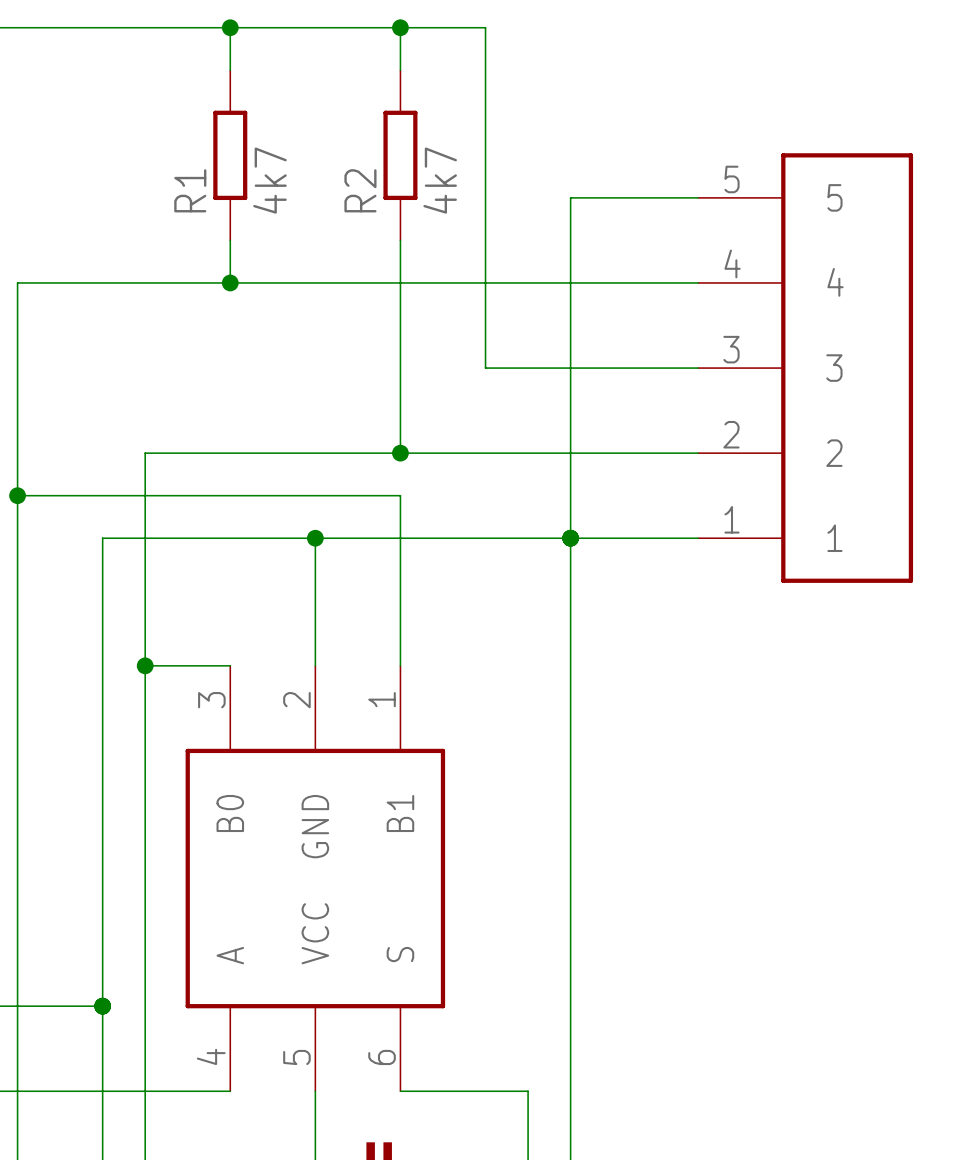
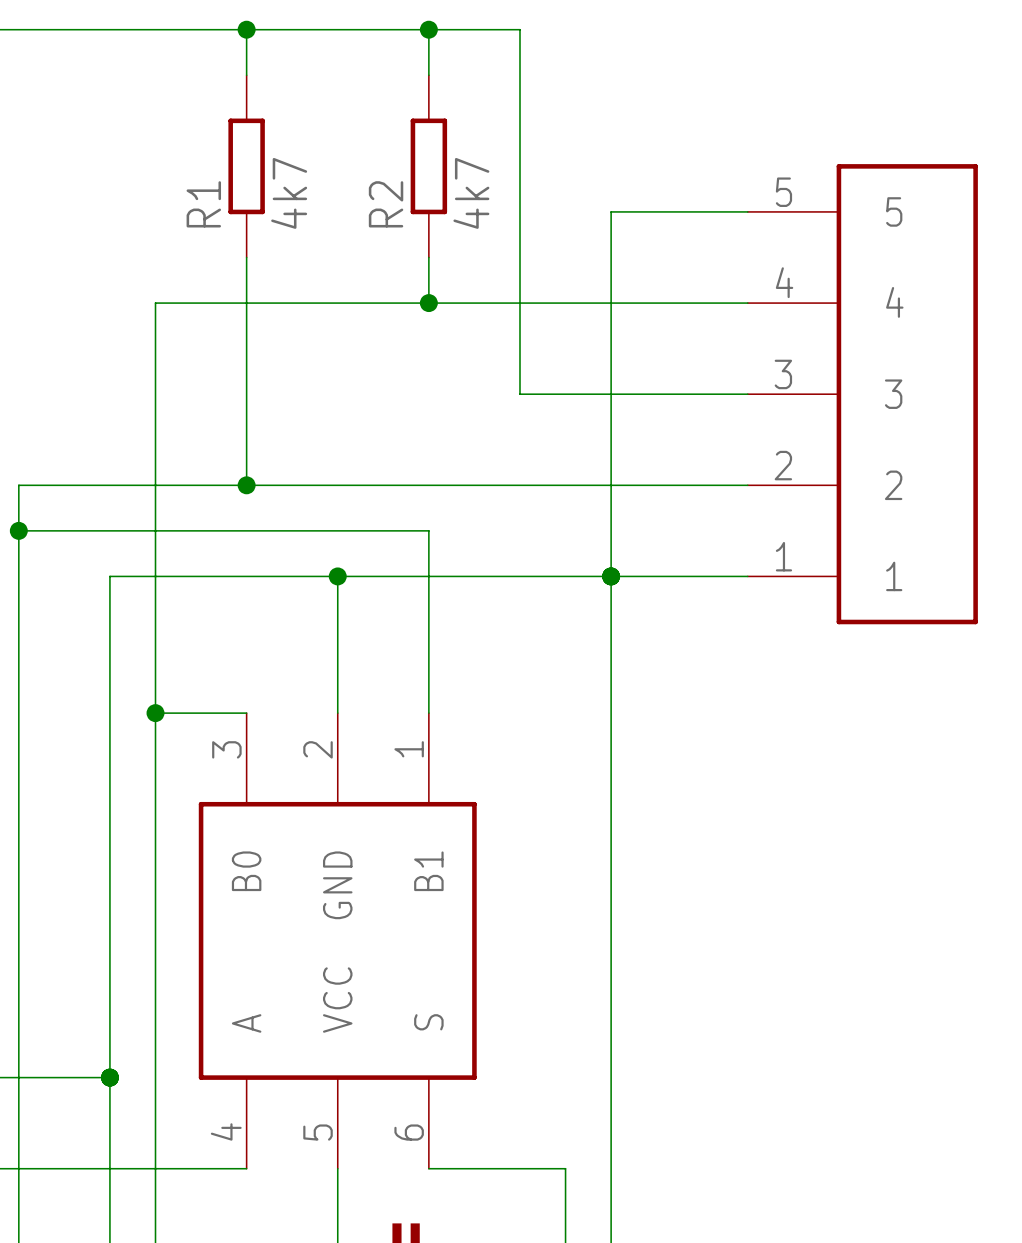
wire: (145, 282) (17, 282) (17, 453) -> (155, 303) (155, 485) (18, 485)
junction: (230, 282) -> none
wire: (400, 282) (400, 453) -> (246, 303) (246, 485)
junction: none -> (428, 303)
junction: none -> (246, 485)
junction: (400, 453) -> none

